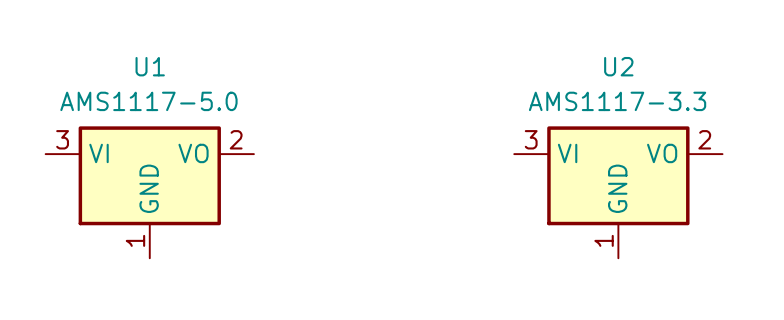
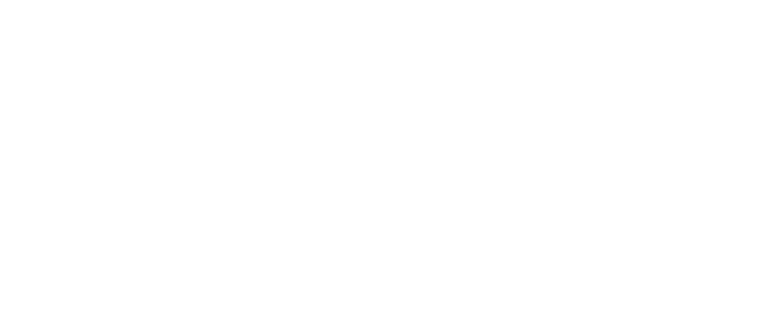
U1: AMS1117-5.0 (149, 192) -> none
U2: AMS1117-3.3 (618, 192) -> none

